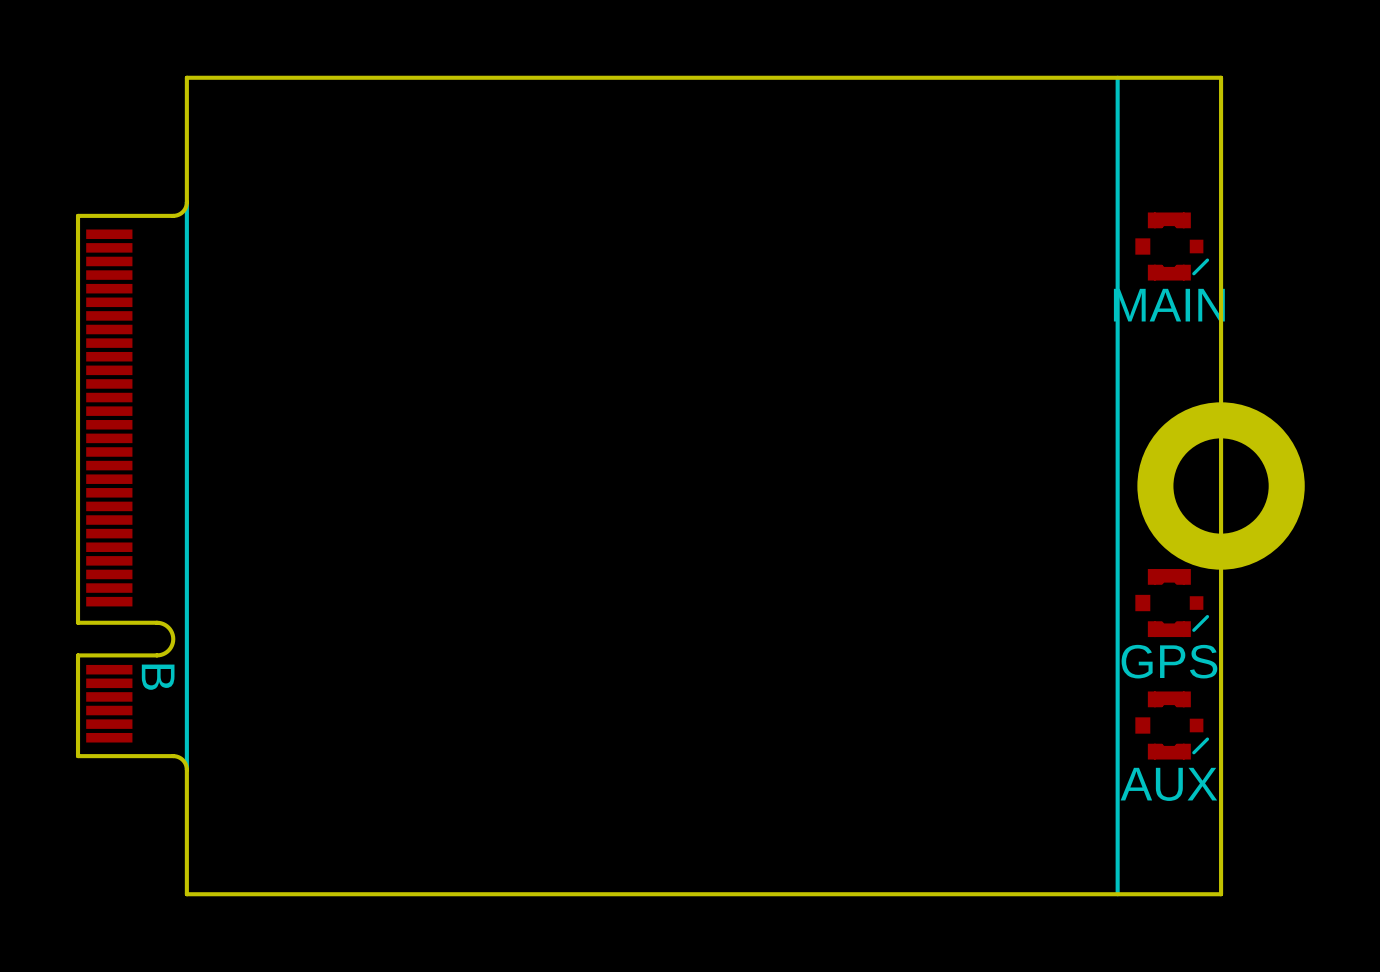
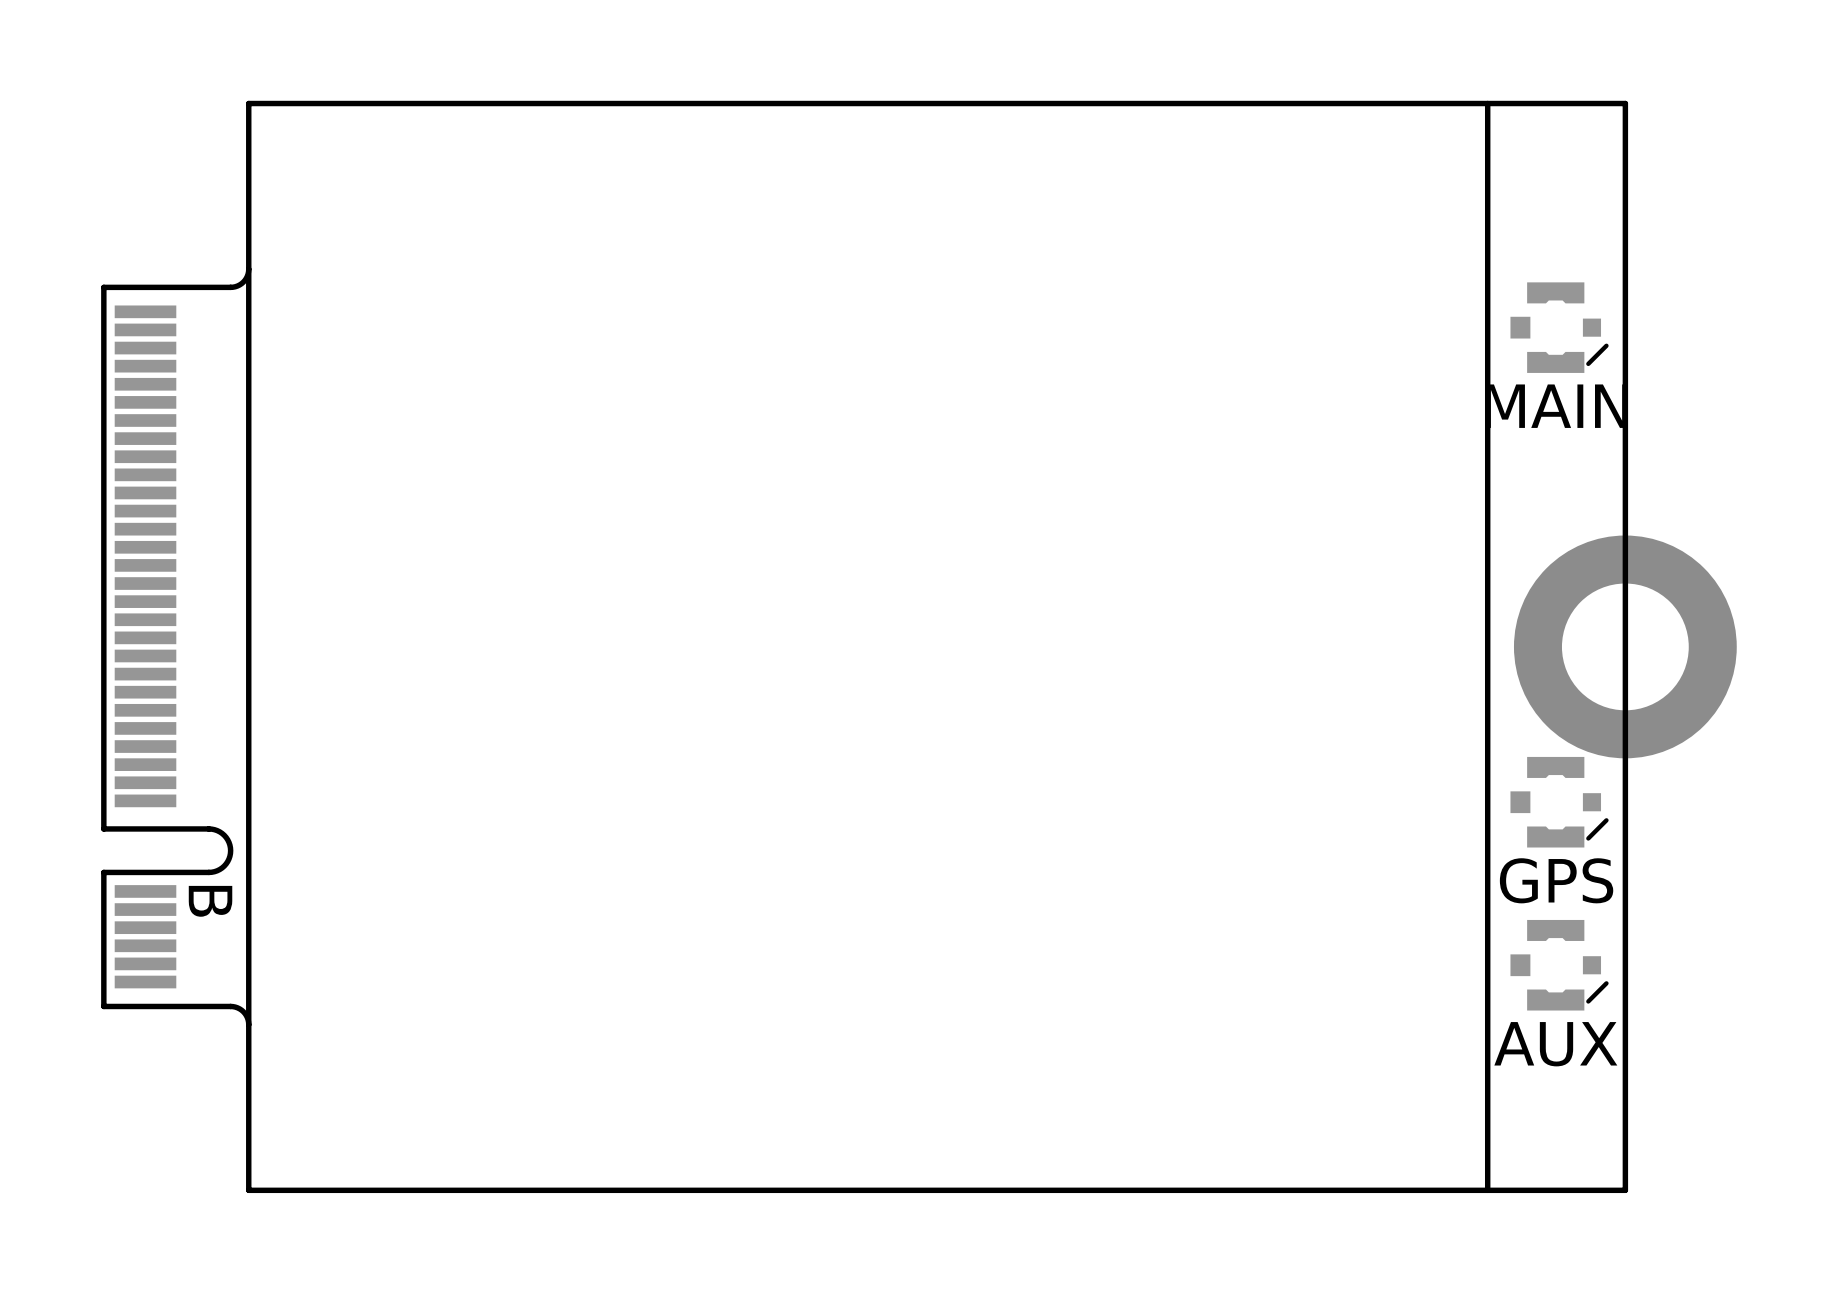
part footprint: [1135, 212, 1210, 281] -> [1510, 282, 1609, 373]
part footprint: [1135, 569, 1210, 638] -> [1510, 756, 1609, 848]
part footprint: [1135, 691, 1210, 760] -> [1510, 919, 1609, 1011]

